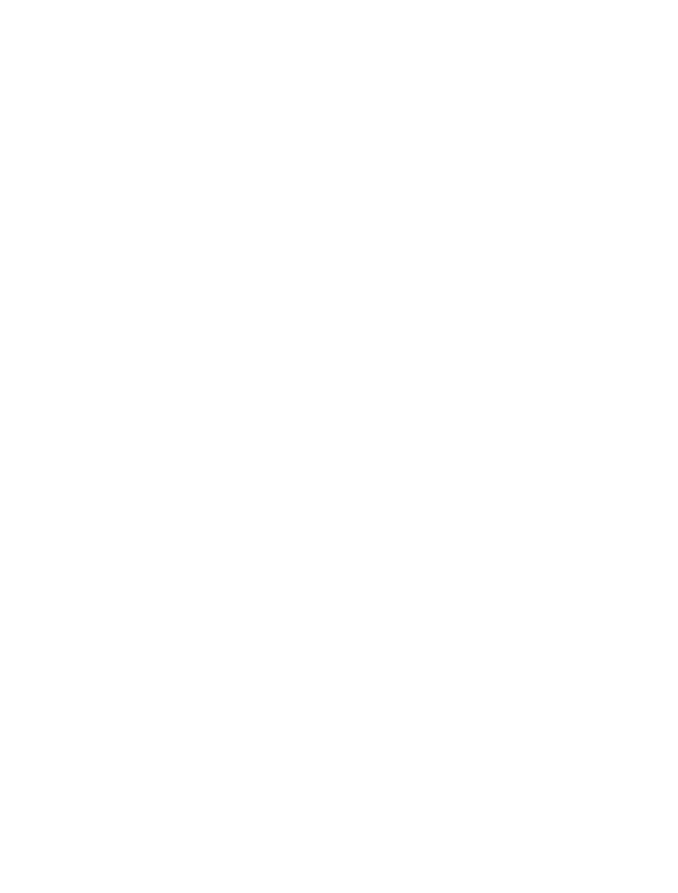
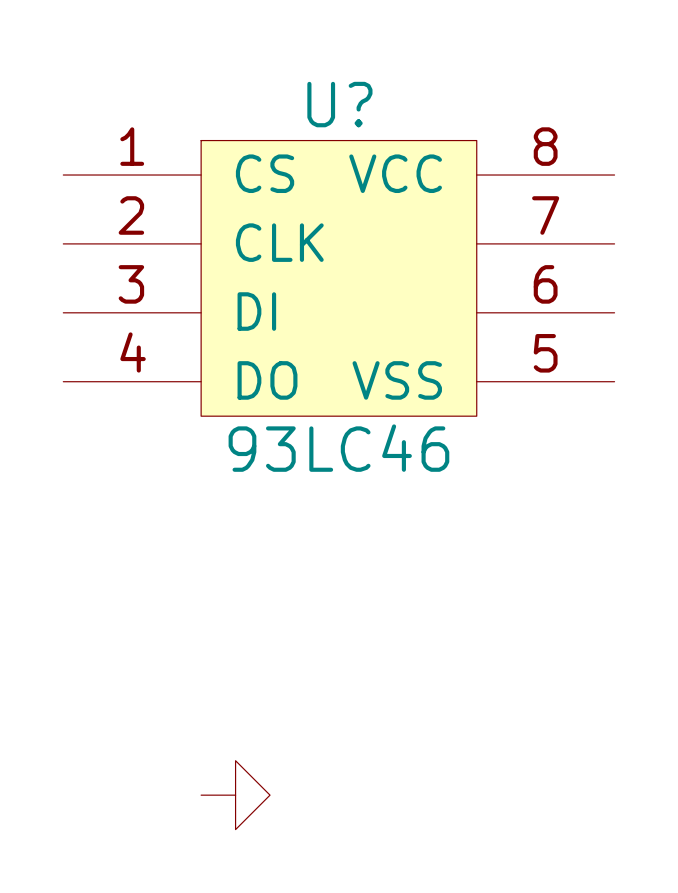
U?: none -> 93LC46 (338, 278)
power symbol: none -> (235, 795)

